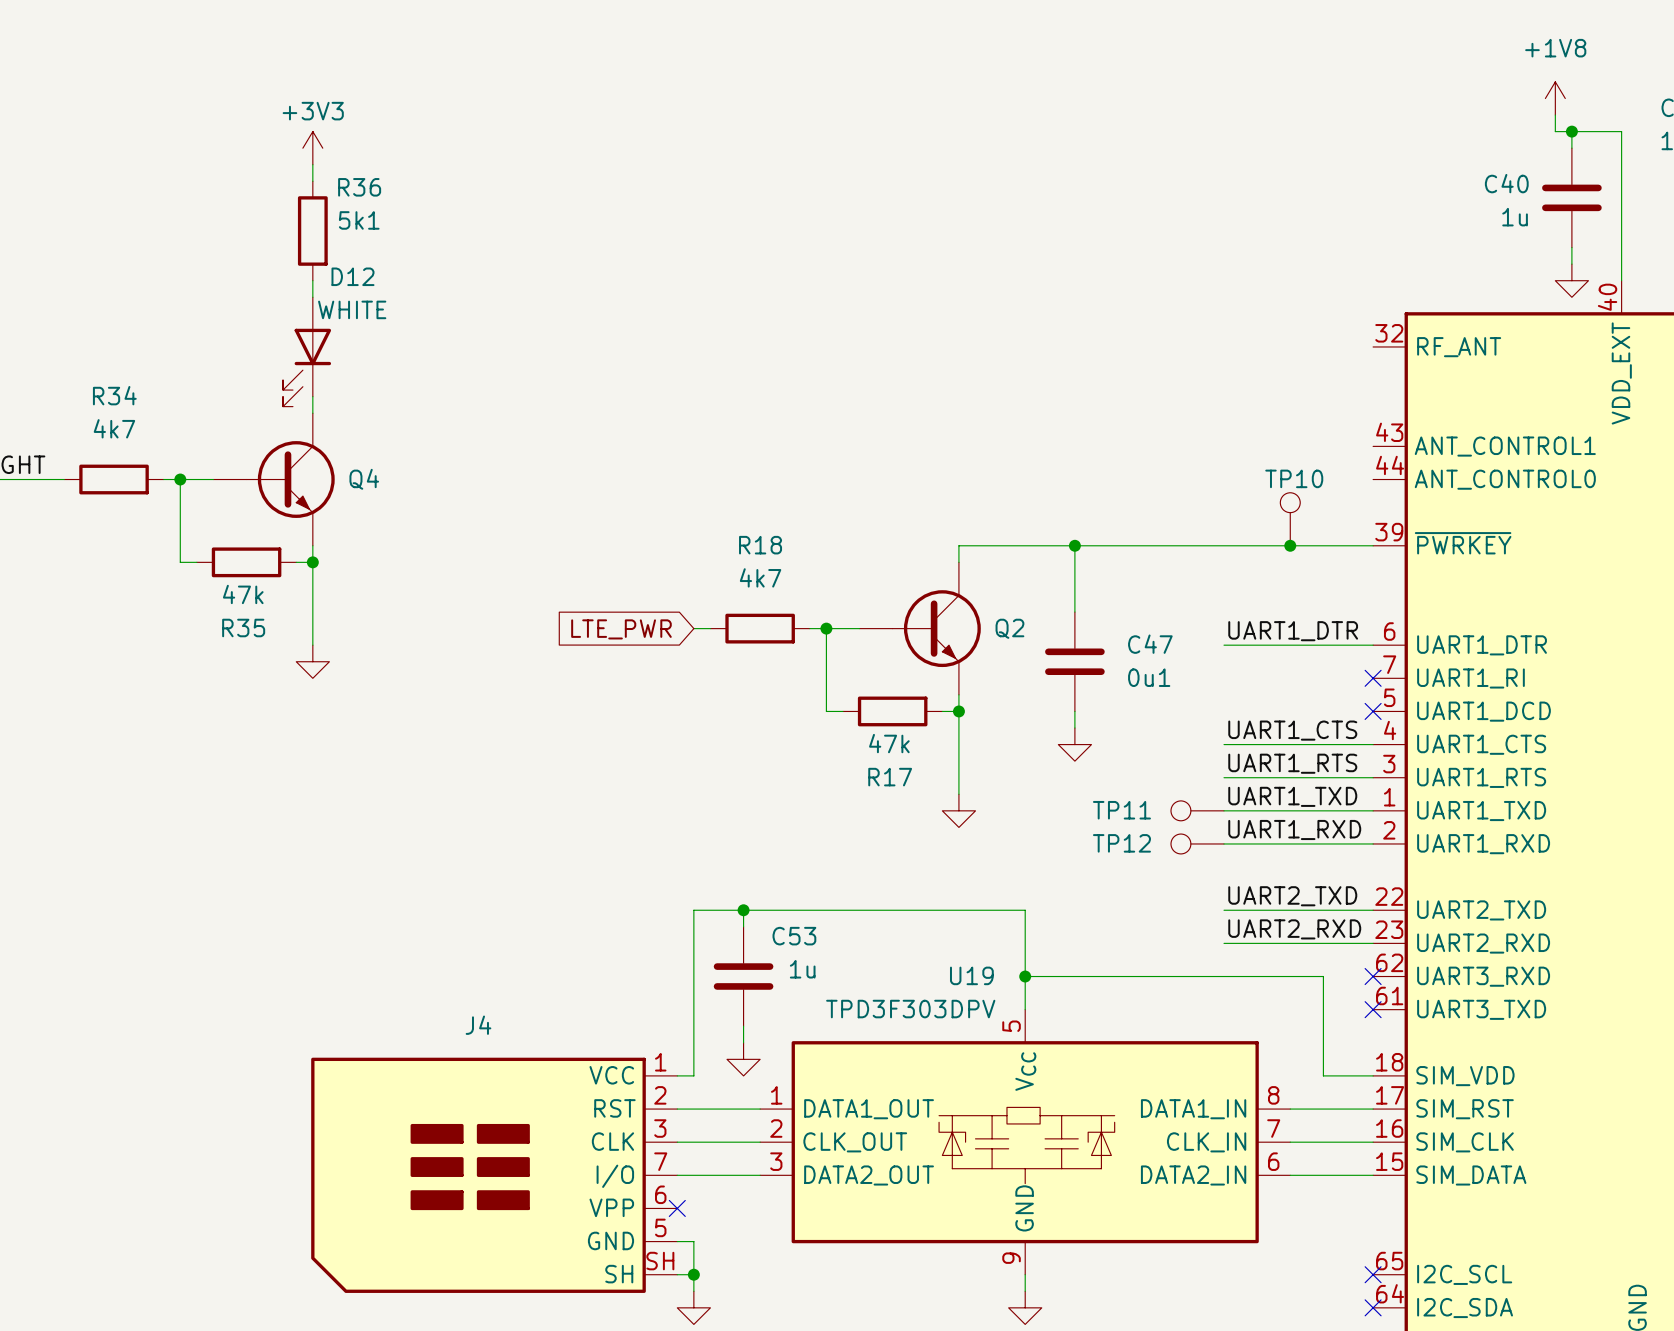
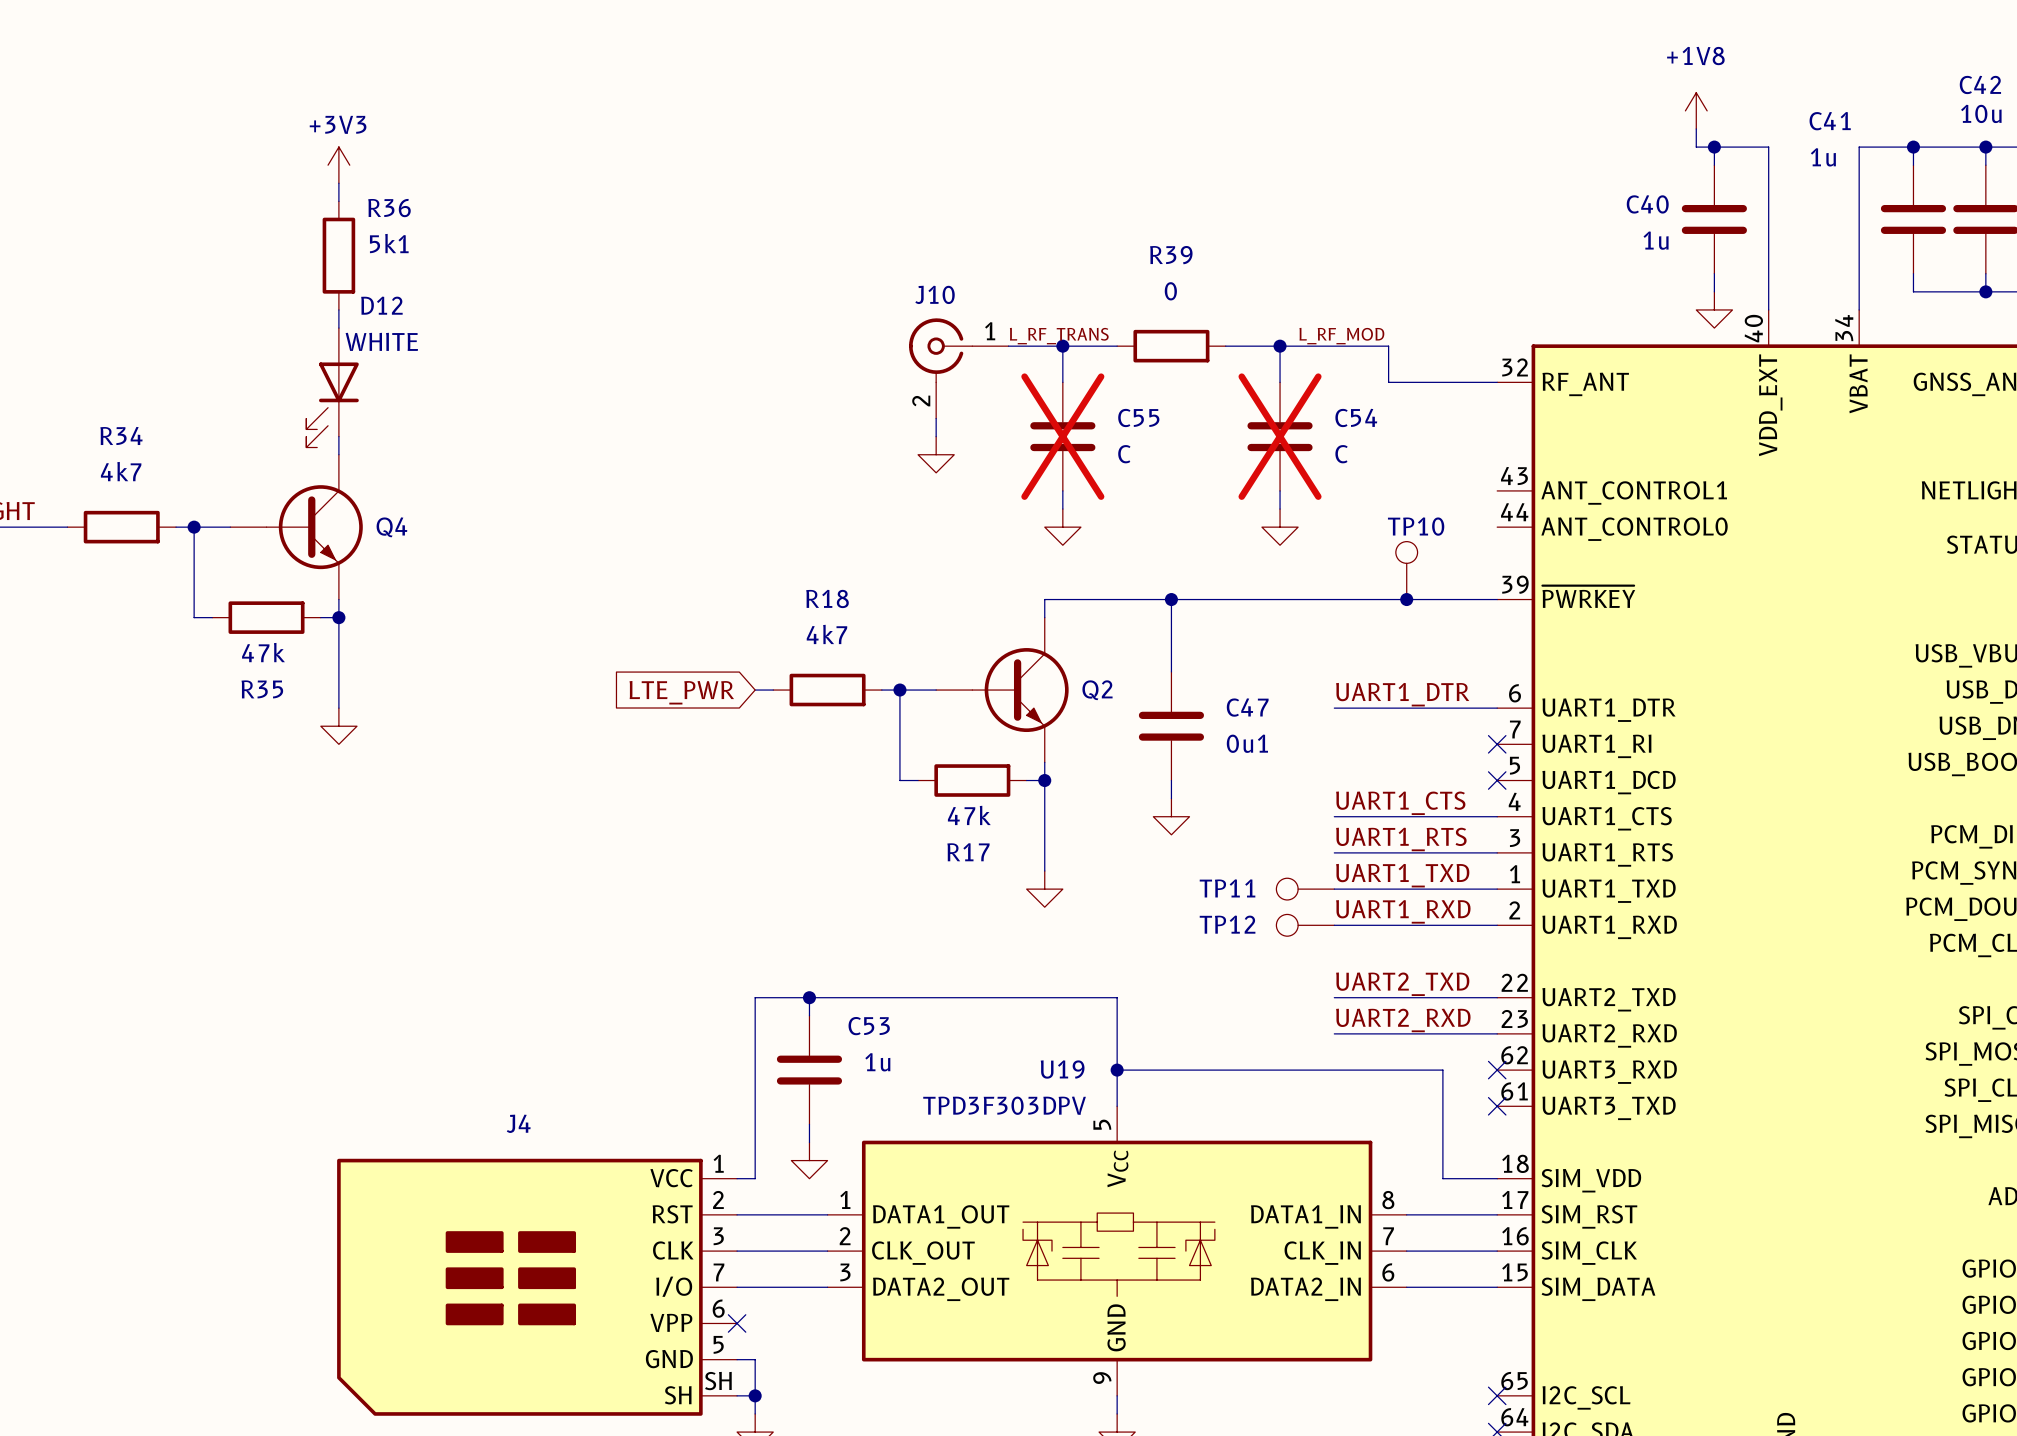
label: none -> L_RF_TRANS (1059, 336)
label: none -> L_RF_MOD (1341, 336)
wire: none -> (1008, 346) (1117, 346)
wire: none -> (1062, 346) (1062, 382)
junction: none -> (1062, 346)
R39: none -> 0 (1171, 346)
wire: none -> (1225, 346) (1388, 346) (1388, 382) (1497, 382)
wire: none -> (1280, 346) (1280, 382)
junction: none -> (1280, 346)
J10: none -> (958, 368)
wire: none -> (936, 418) (936, 436)
C55: none -> C (1062, 436)
C54: none -> C (1280, 436)
power symbol: none -> (936, 454)
wire: none -> (1062, 490) (1062, 509)
wire: none -> (1280, 490) (1280, 509)
power symbol: none -> (1062, 527)
power symbol: none -> (1280, 527)

